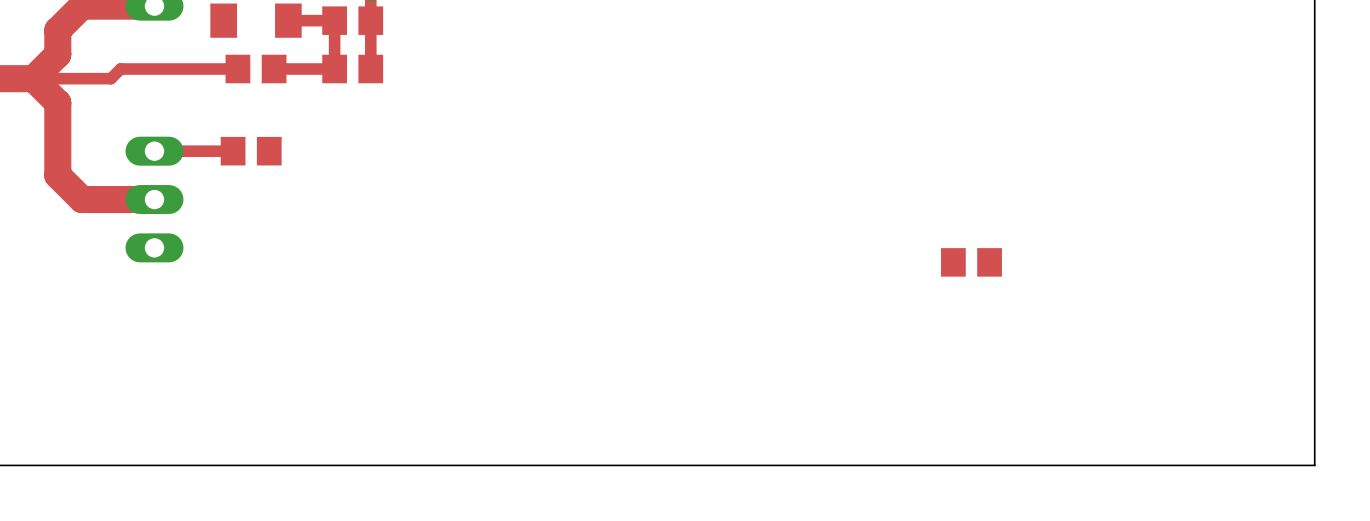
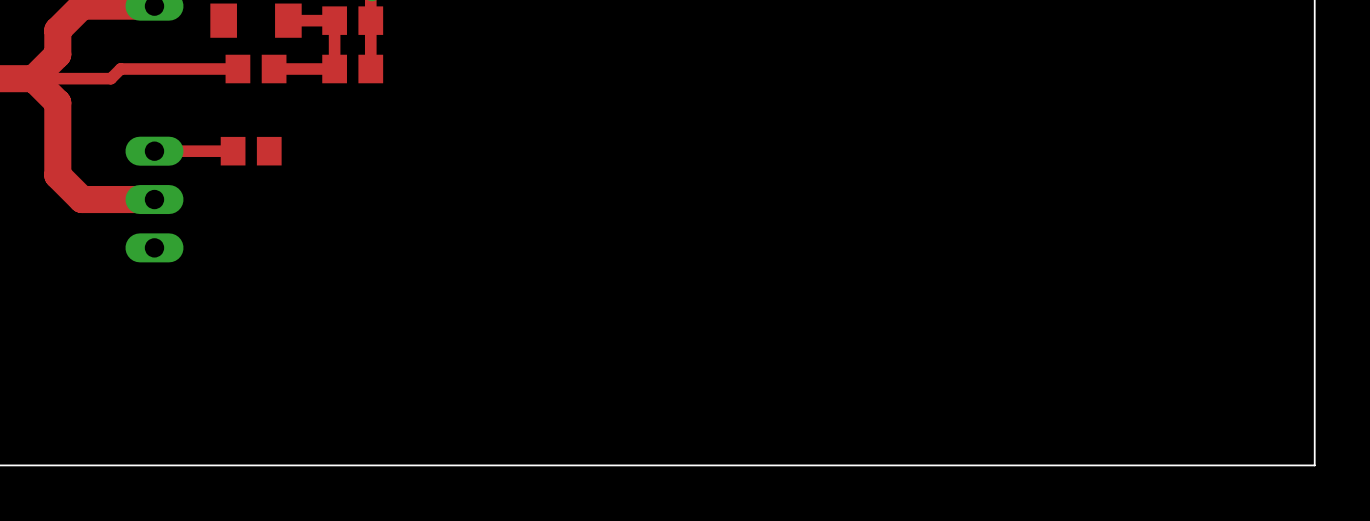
part: (971, 262) -> none

